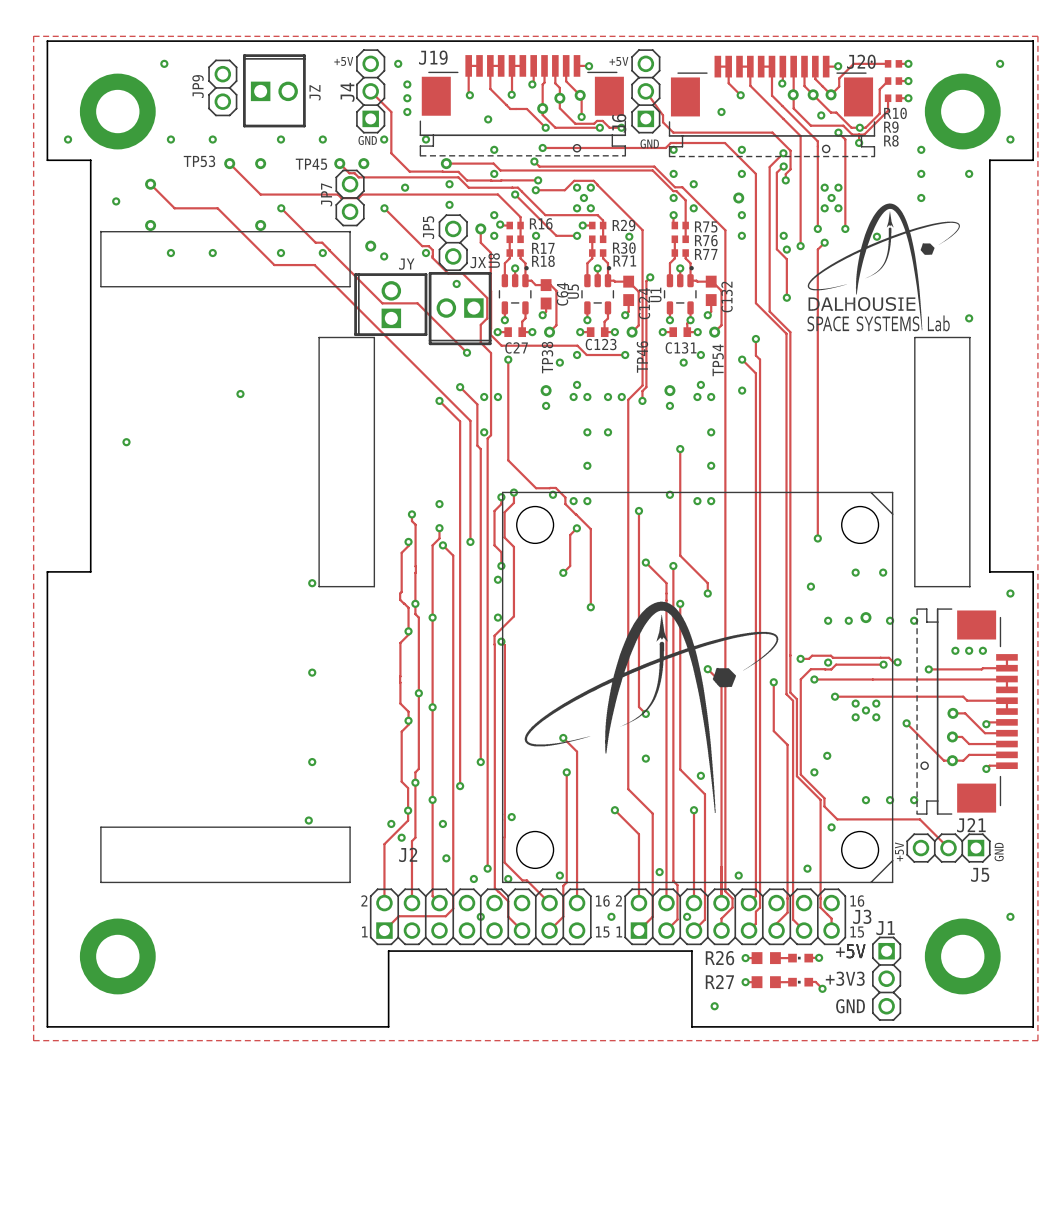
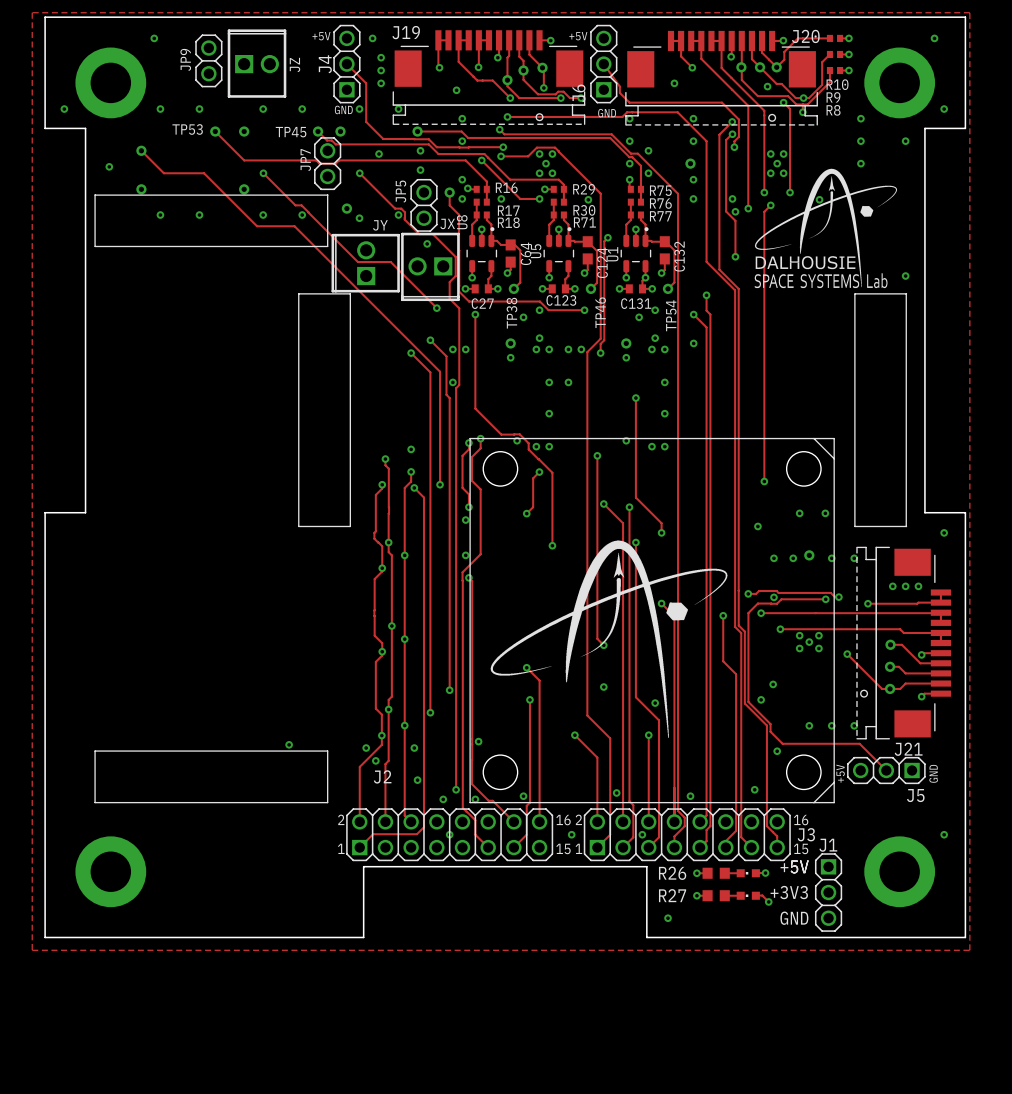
via: (240, 394) -> none
via: (126, 442) -> none
via: (312, 583) -> none
via: (312, 672) -> none
via: (312, 762) -> none

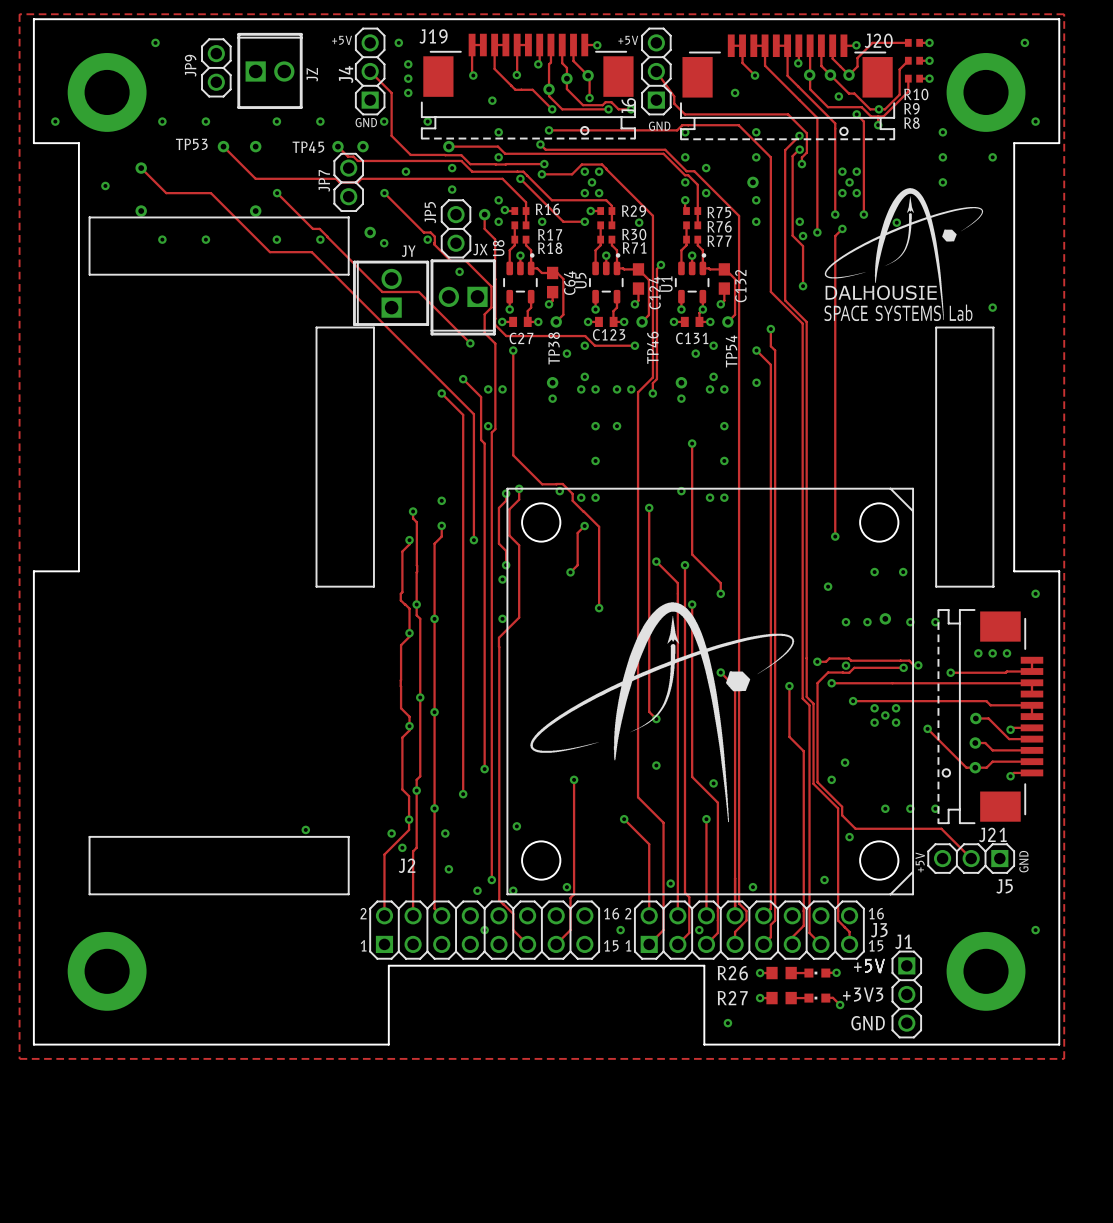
track: (414, 487) (423, 497) (423, 827) (417, 834) (373, 834) (359, 847) -> none
via: (414, 487) -> none
track: (468, 577) (472, 581) (471, 784) (488, 800) (492, 800) (513, 821) -> none
via: (468, 577) -> none
track: (526, 667) (539, 680) (539, 821) -> none
via: (526, 667) -> none

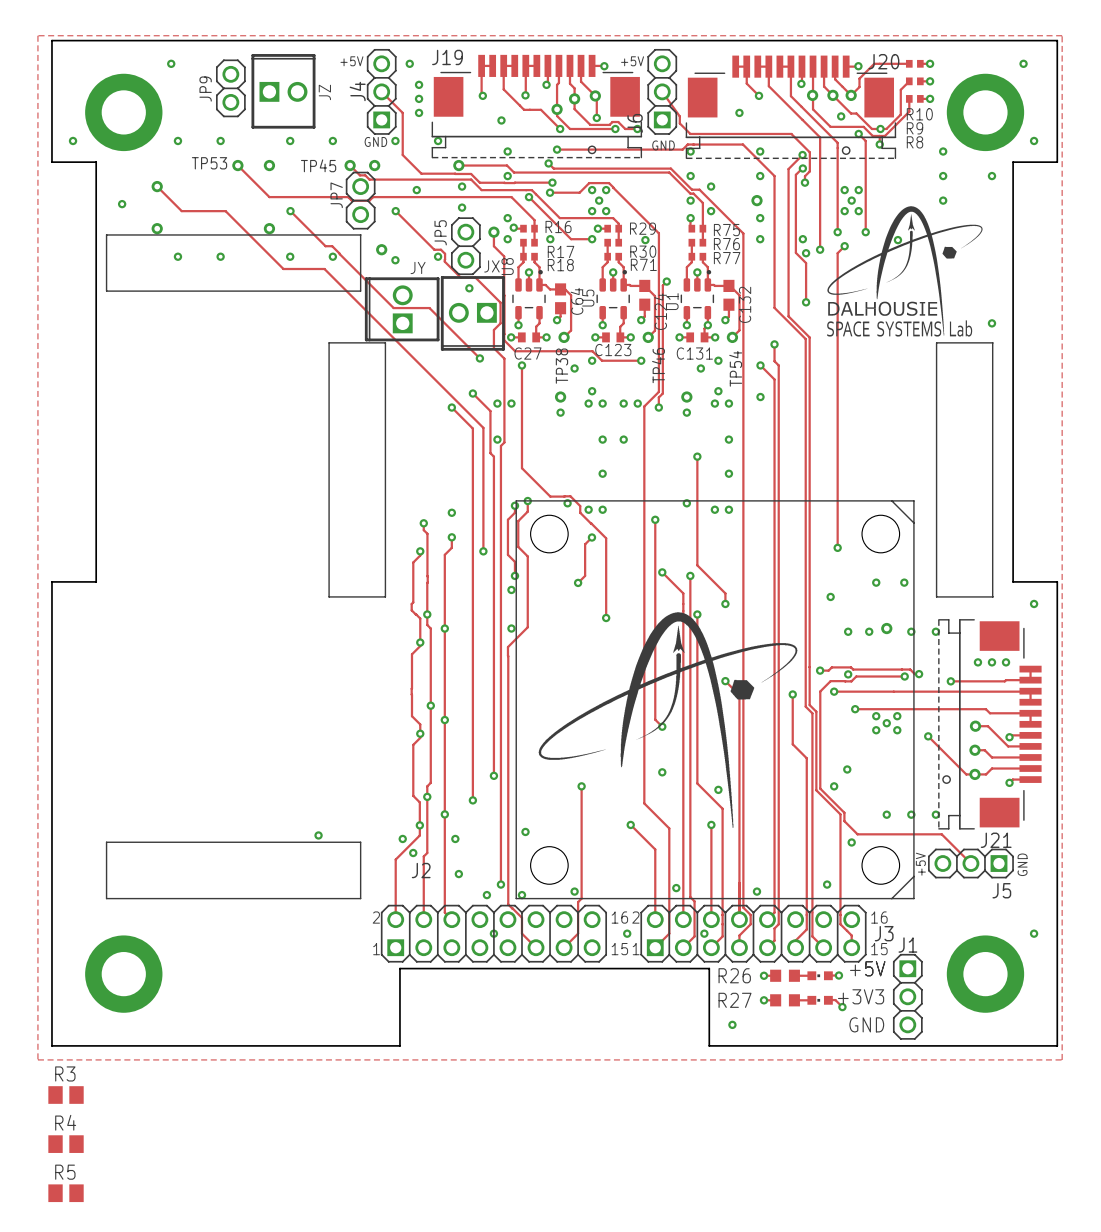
R3: none -> (66, 1095)
R4: none -> (66, 1144)
R5: none -> (66, 1193)

